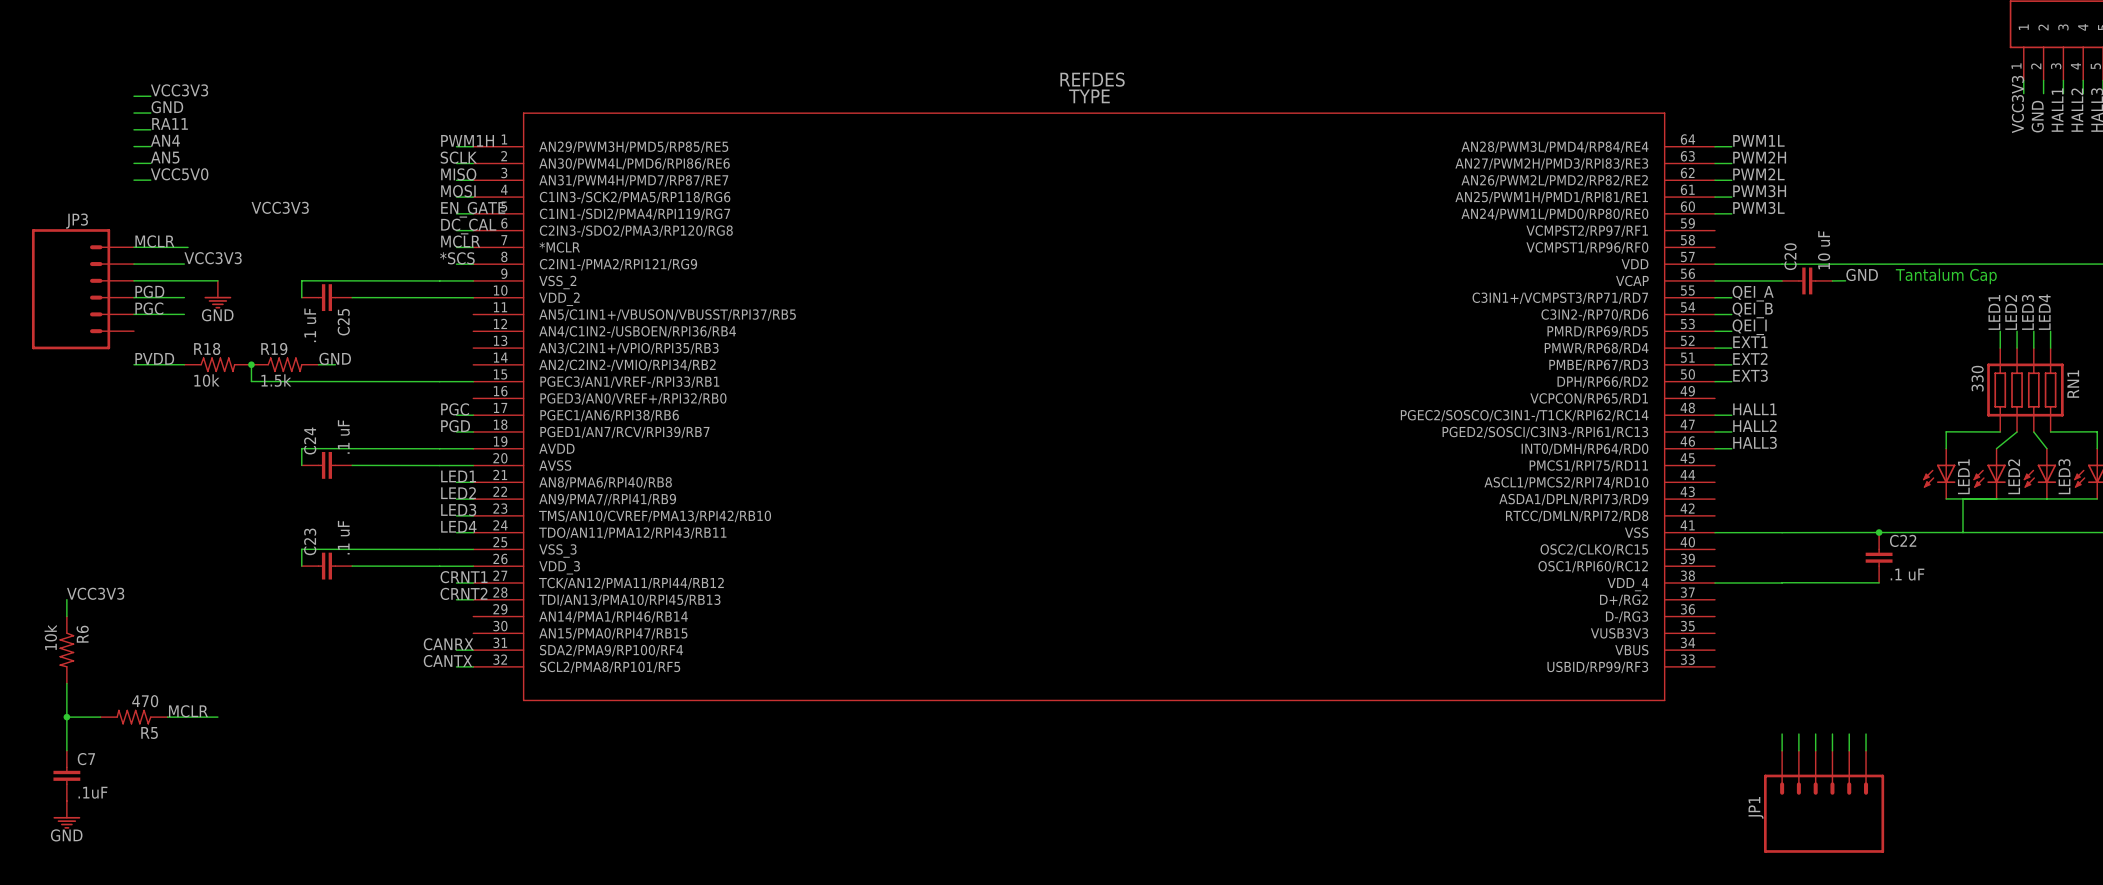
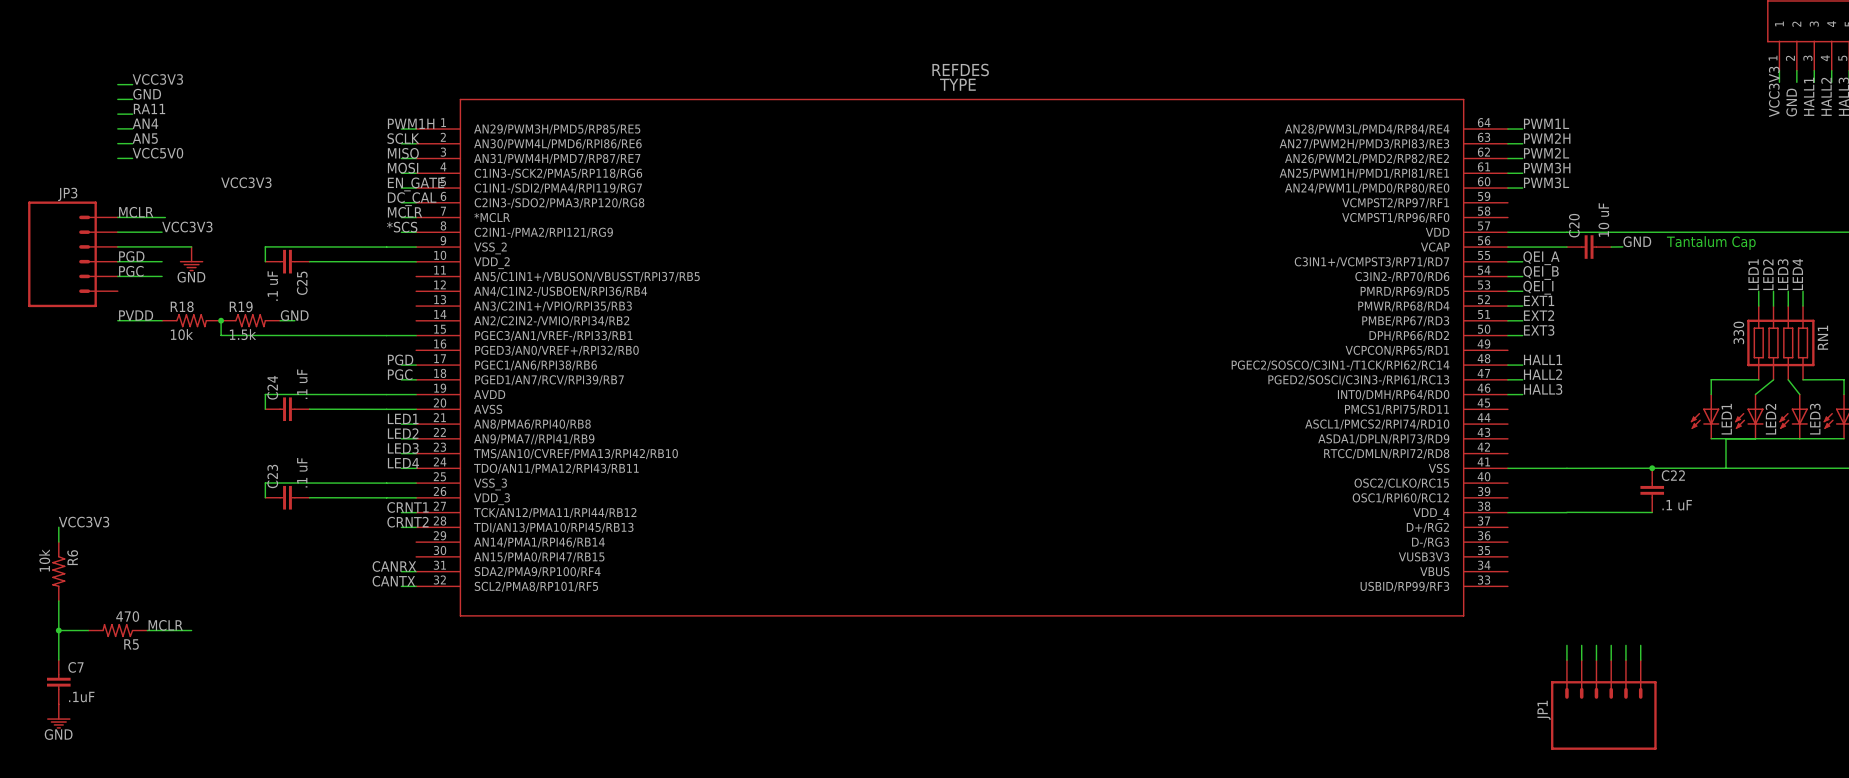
label: PGC (455, 409) -> PGD (400, 359)
label: PGD (455, 426) -> PGC (400, 374)

